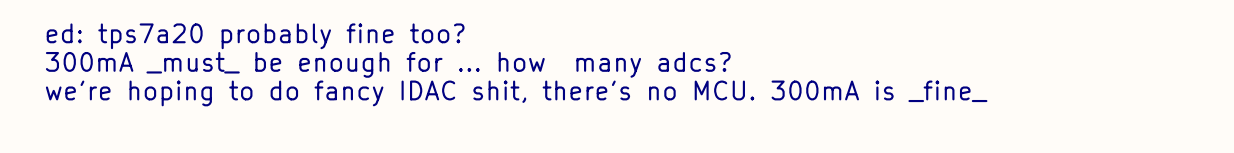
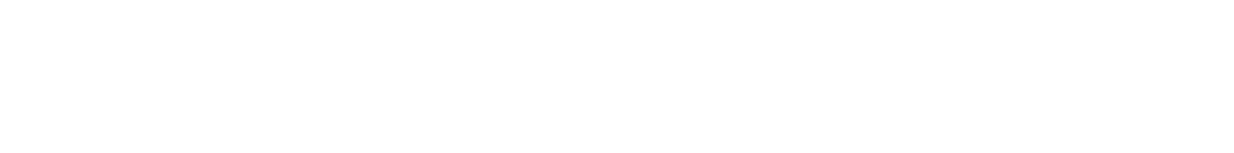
text: ed: tps7a20 probably fine too? (255, 36) -> none
text: 300mA _must_ be enough for ... how many adcs? (388, 64) -> none
text: we're hoping to do fancy IDAC shit, there's no MCU. 300mA is _fine_ (516, 93) -> none

